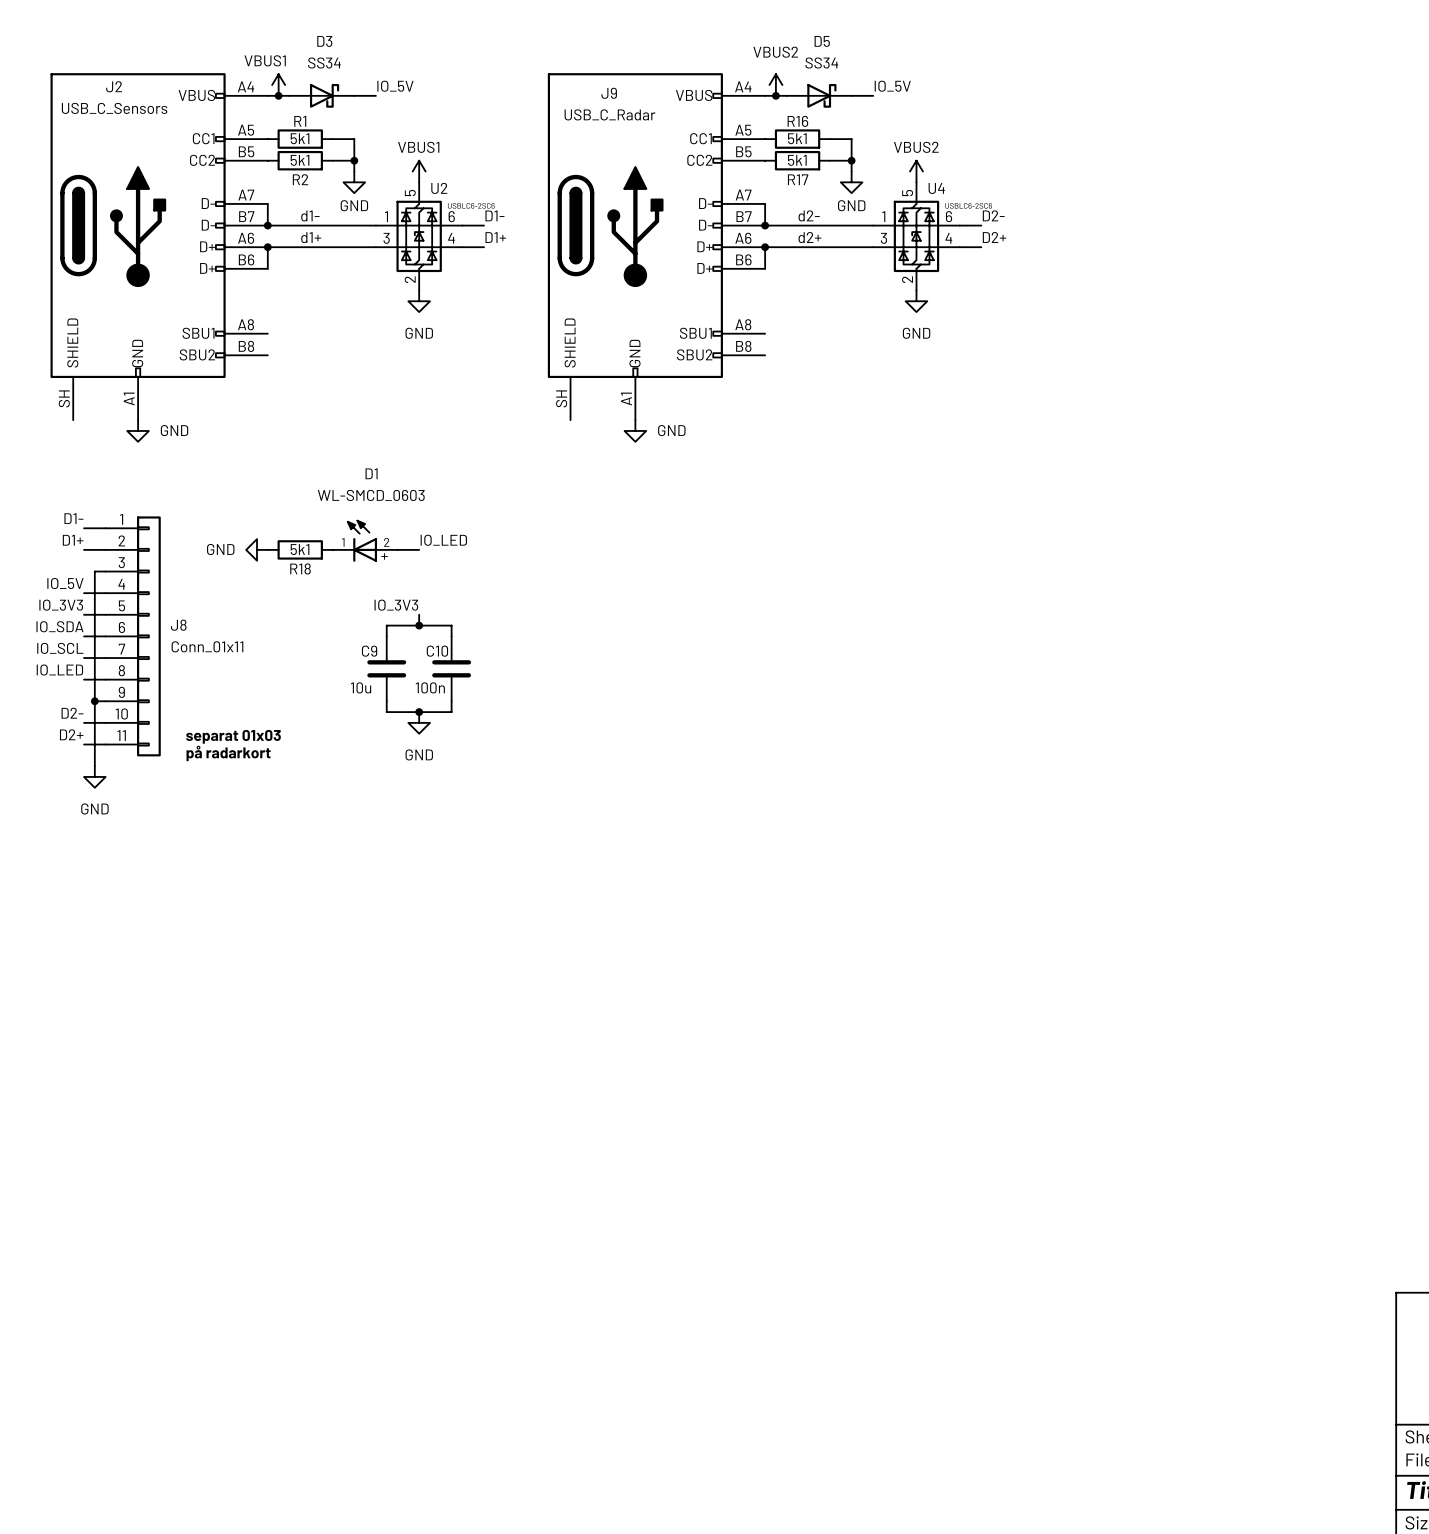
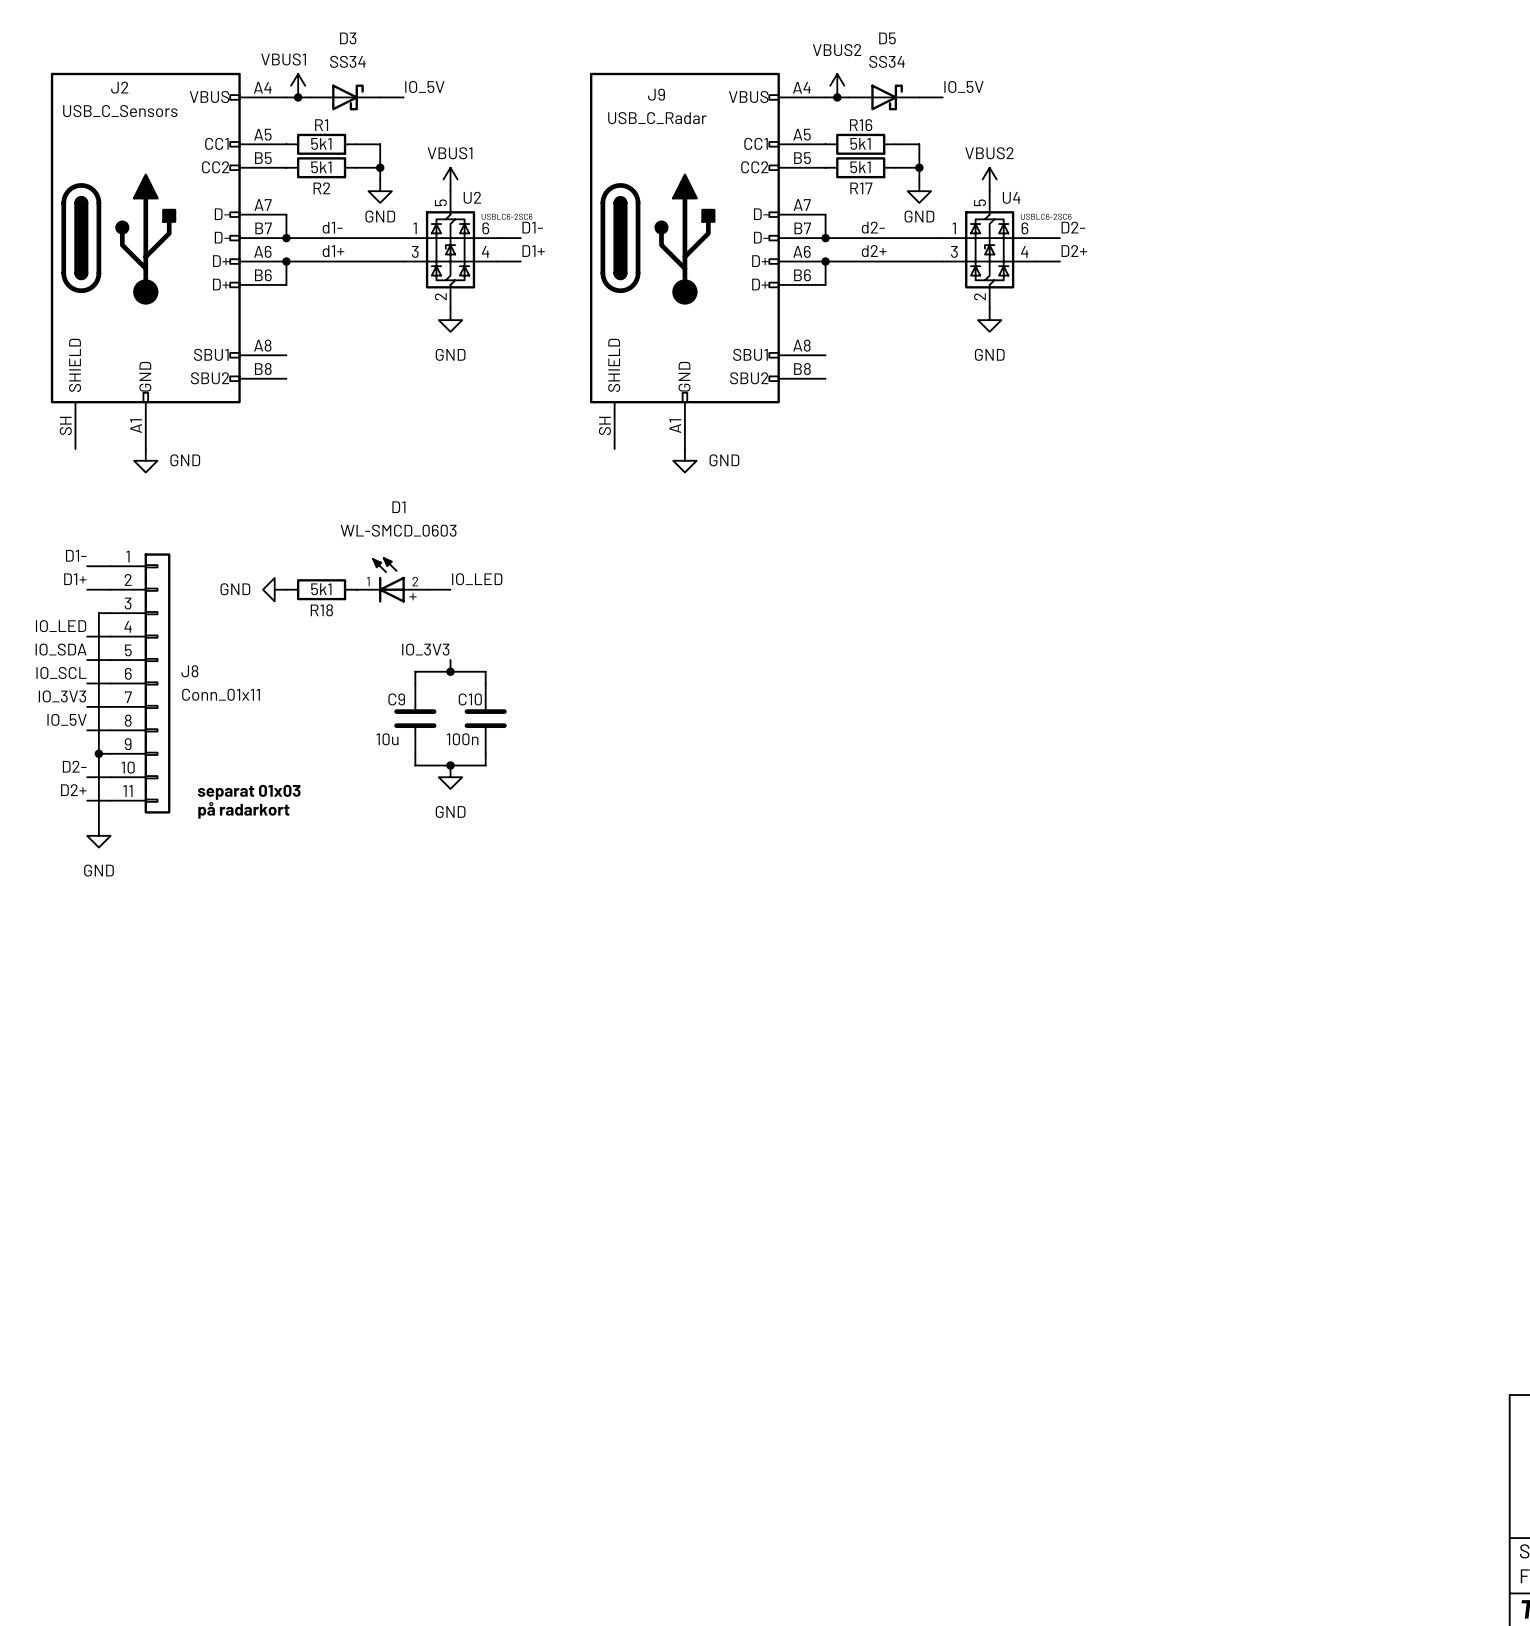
label: IO_5V (65, 583) -> IO_LED (61, 626)
label: IO_3V3 (61, 605) -> IO_SDA (61, 649)
label: IO_SDA (59, 626) -> IO_SCL (61, 673)
label: IO_SCL (60, 648) -> IO_3V3 (62, 696)
label: IO_LED (59, 670) -> IO_5V (67, 719)

